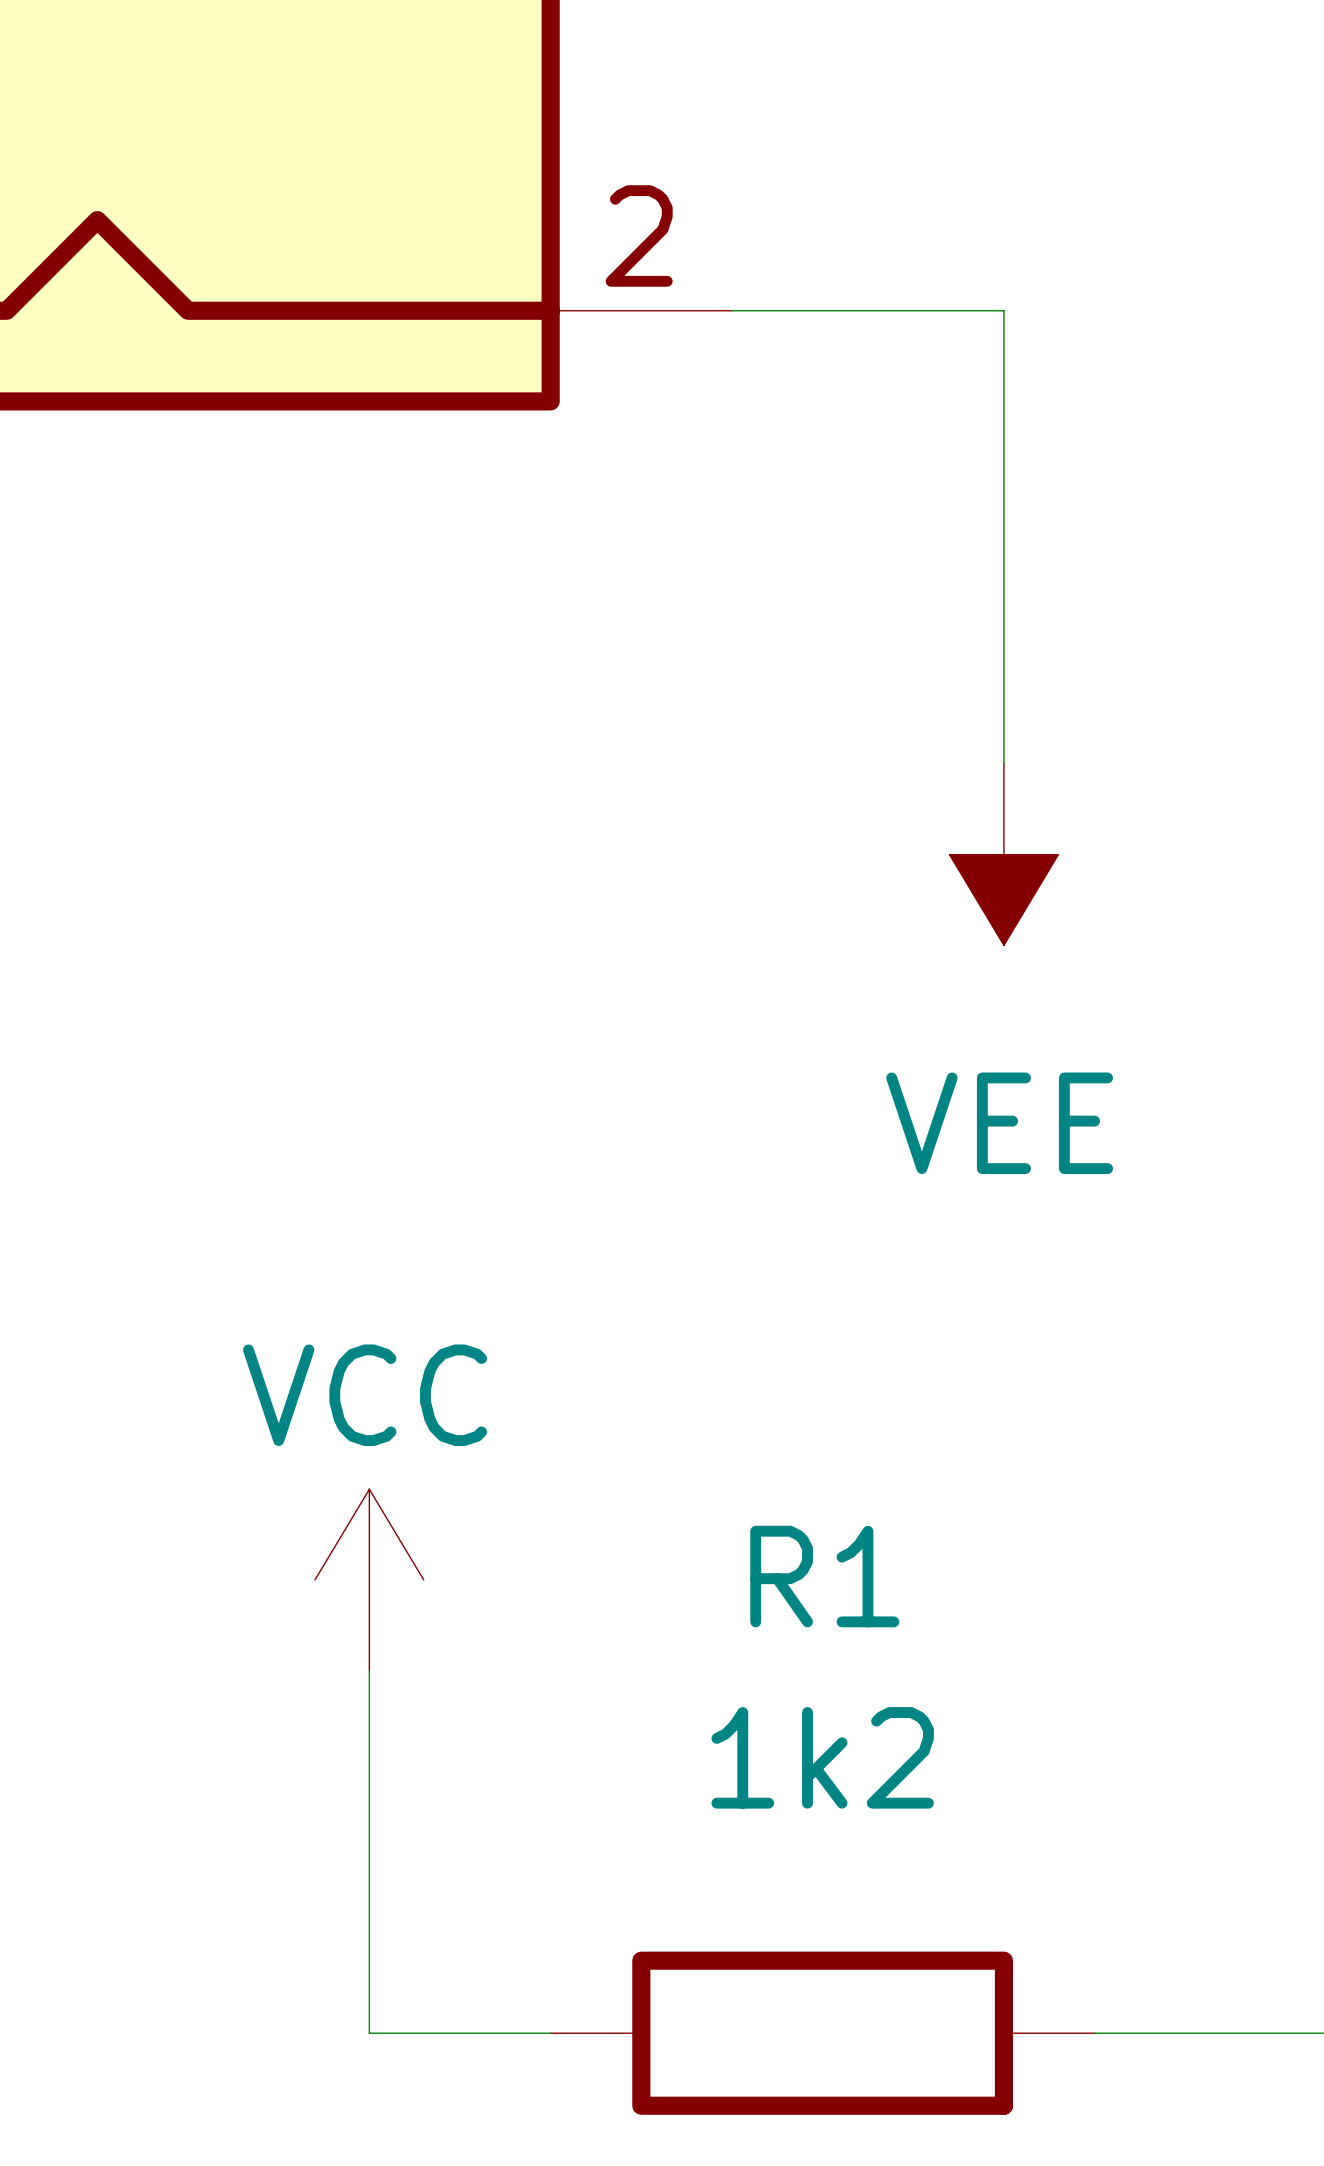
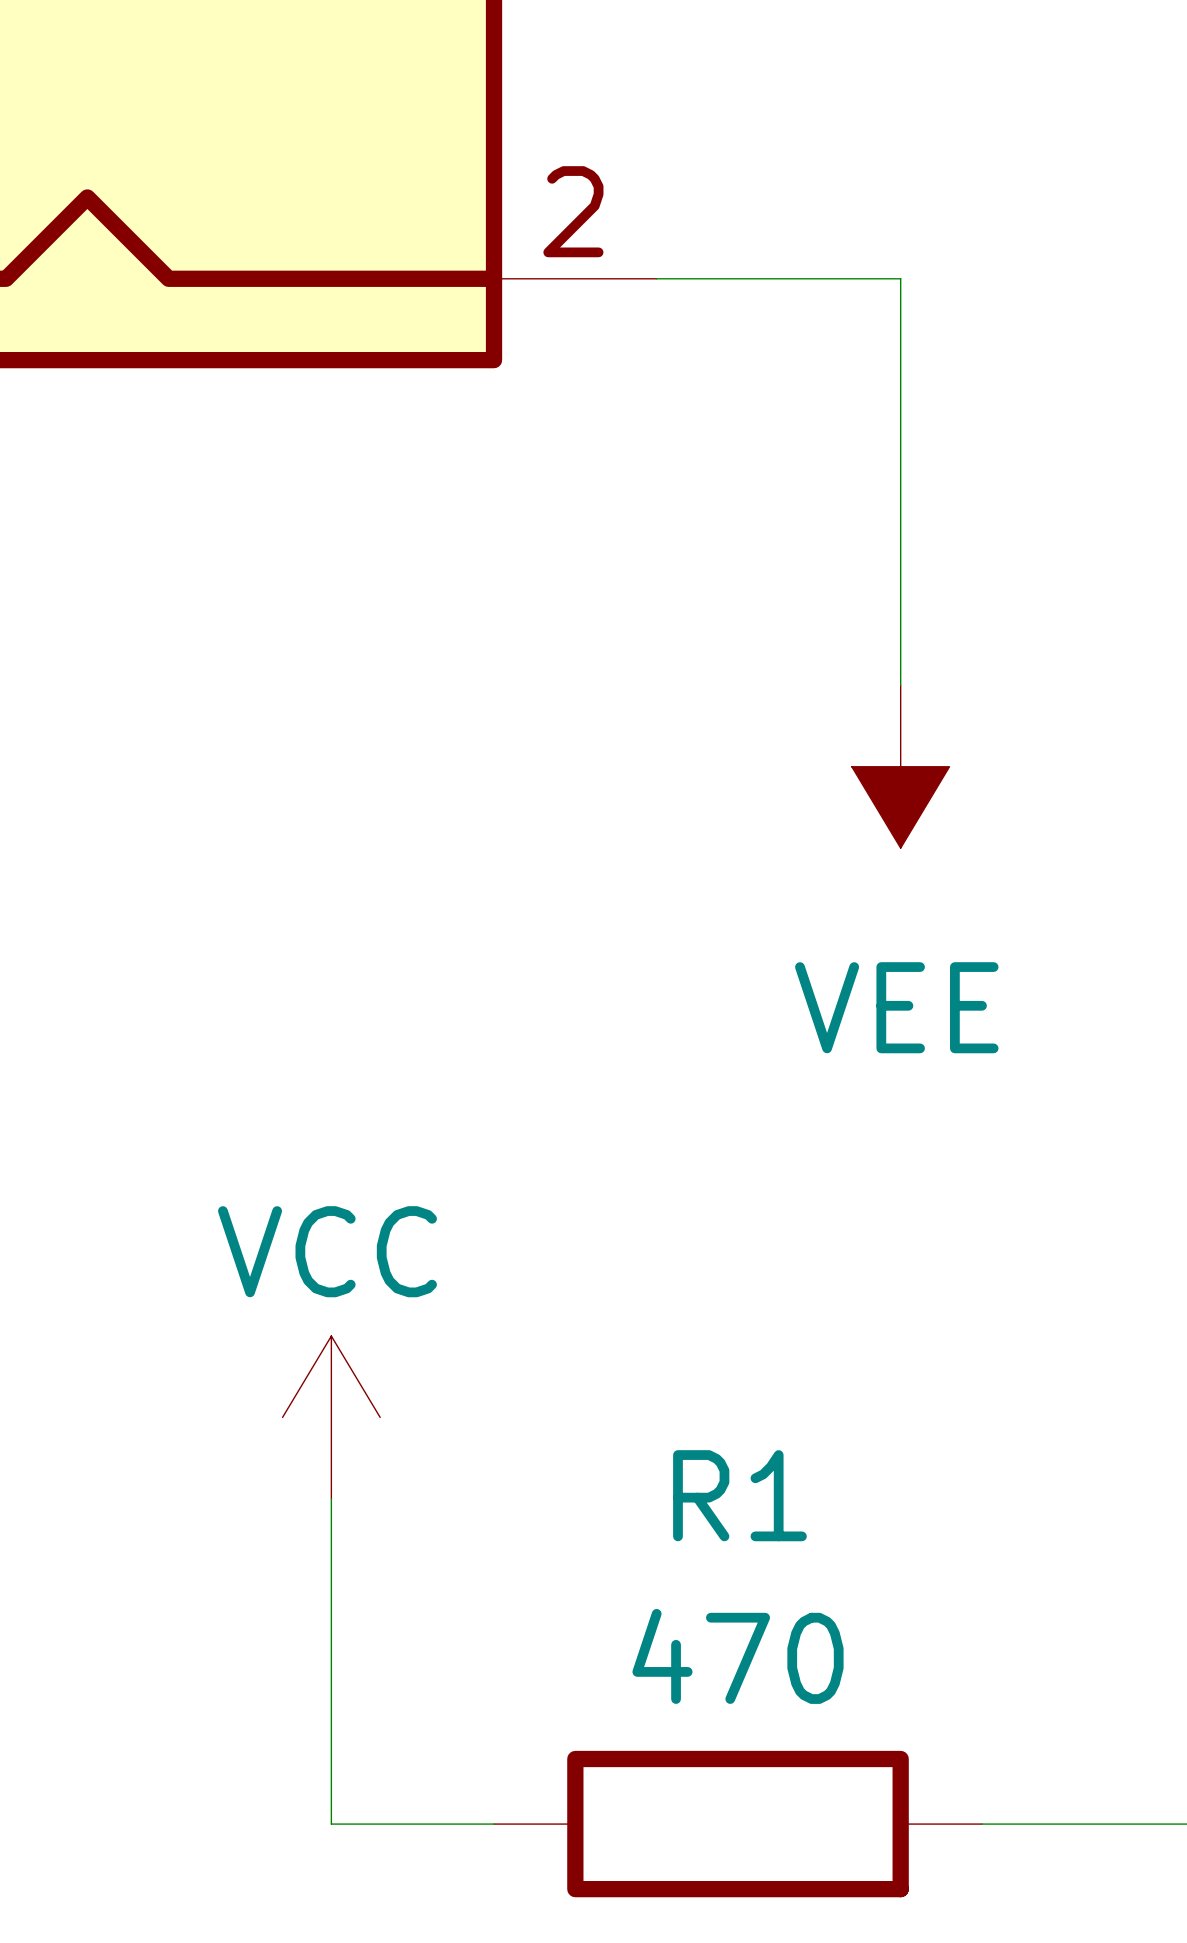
R1 name position: R1 (824, 1576) -> R1 (739, 1495)
R1 value: 1k2 (822, 1757) -> 470 (738, 1656)

